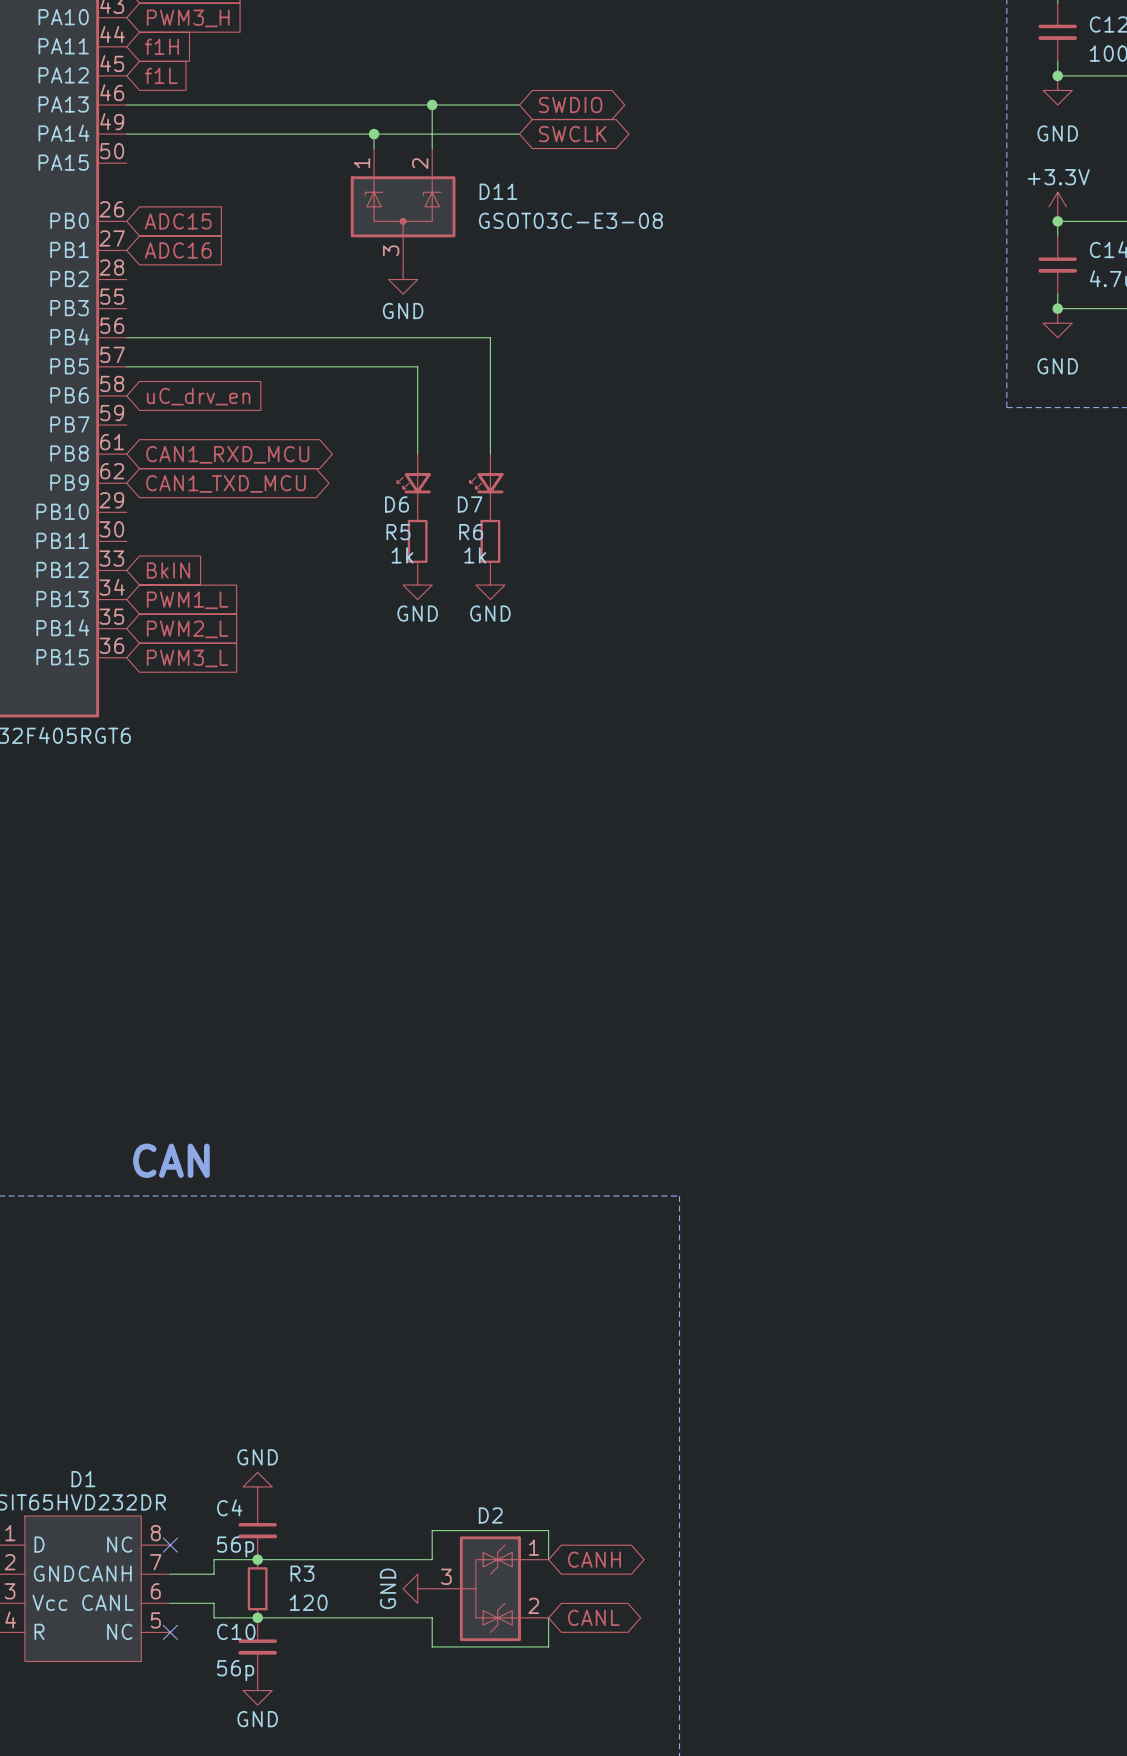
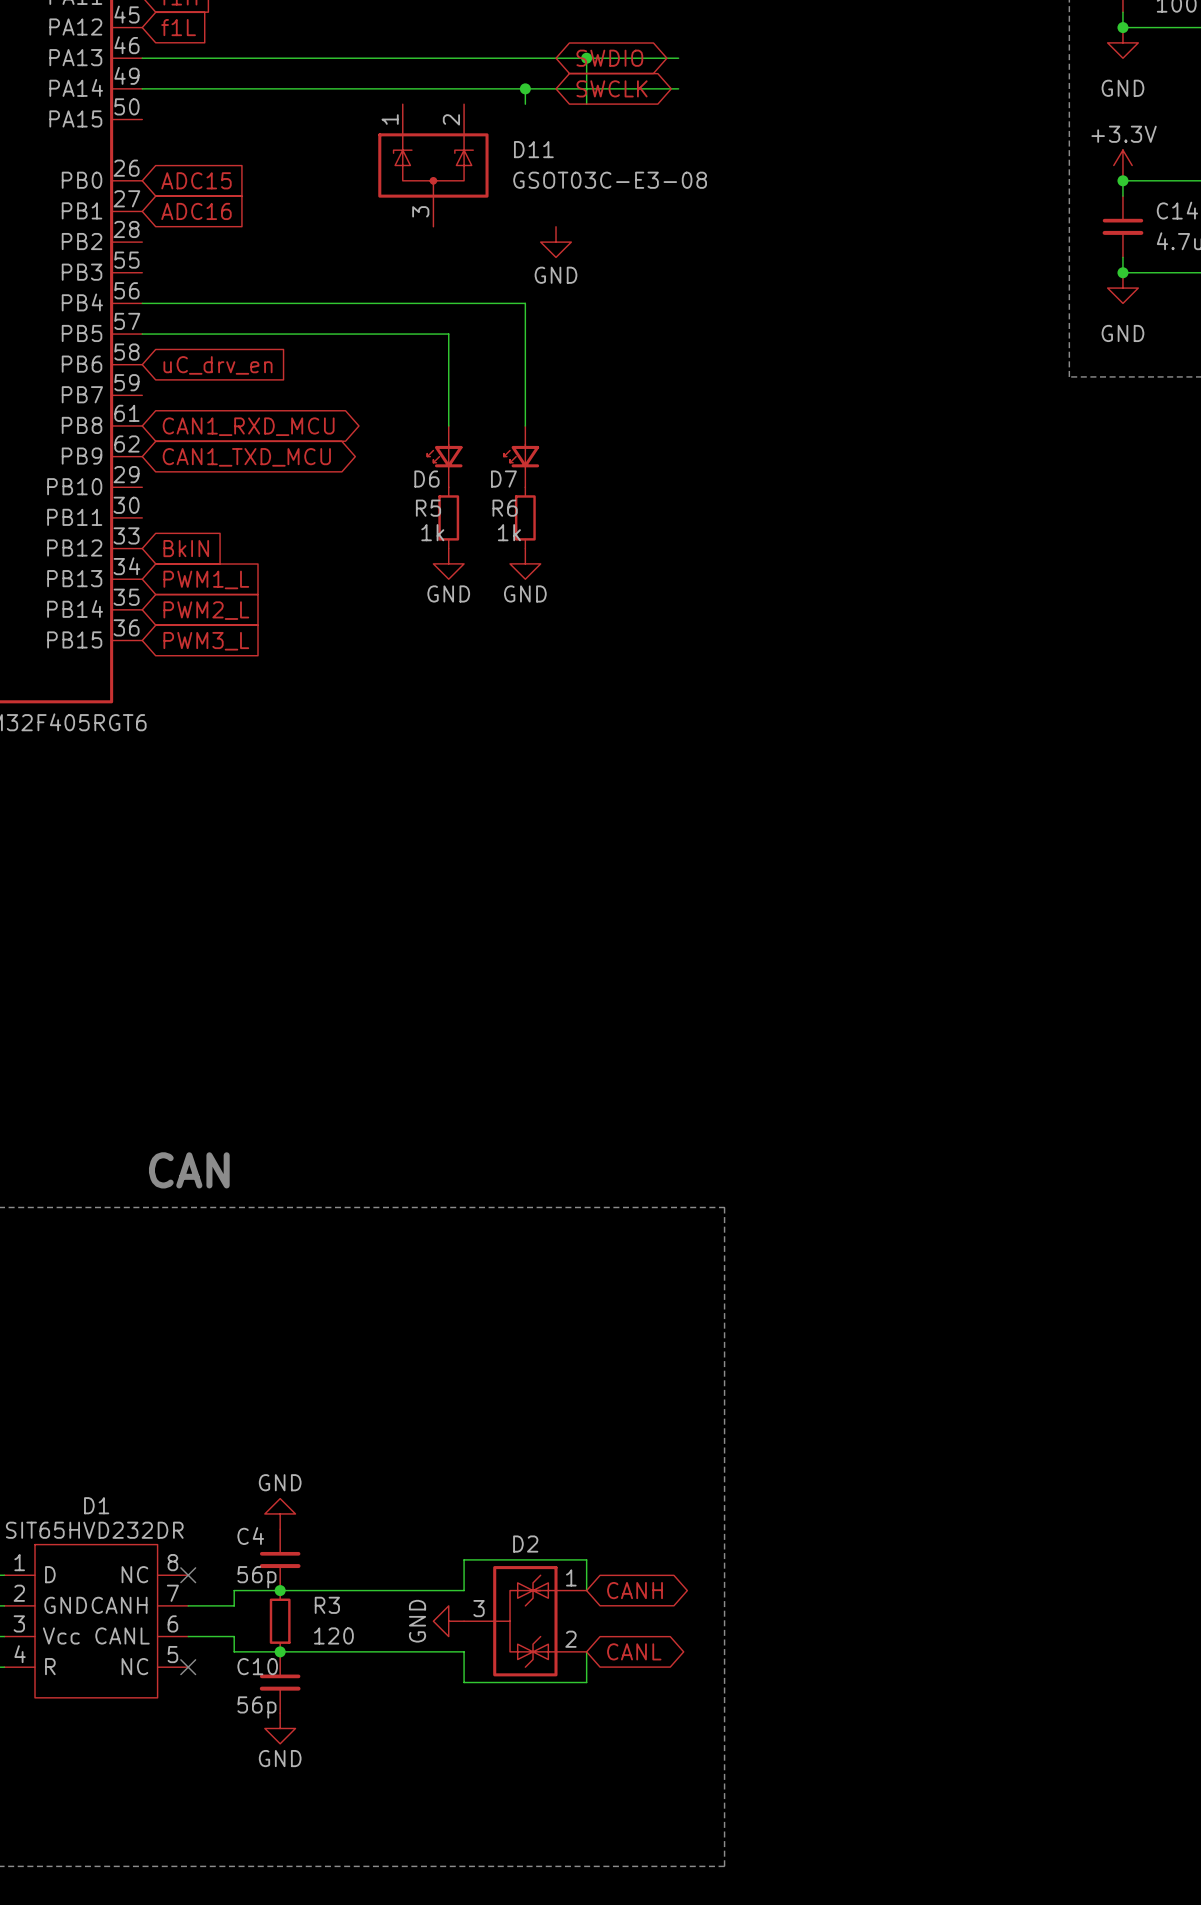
wire: (432, 104) (432, 148) -> (586, 58) (586, 104)
junction: (432, 104) -> none
wire: none -> (556, 58) (678, 58)
junction: none -> (586, 58)
wire: (374, 134) (374, 148) -> (525, 88) (525, 104)
junction: (374, 134) -> none
junction: none -> (525, 88)
wire: none -> (556, 88) (678, 88)
power symbol position: GND (403, 279) -> GND (556, 242)

